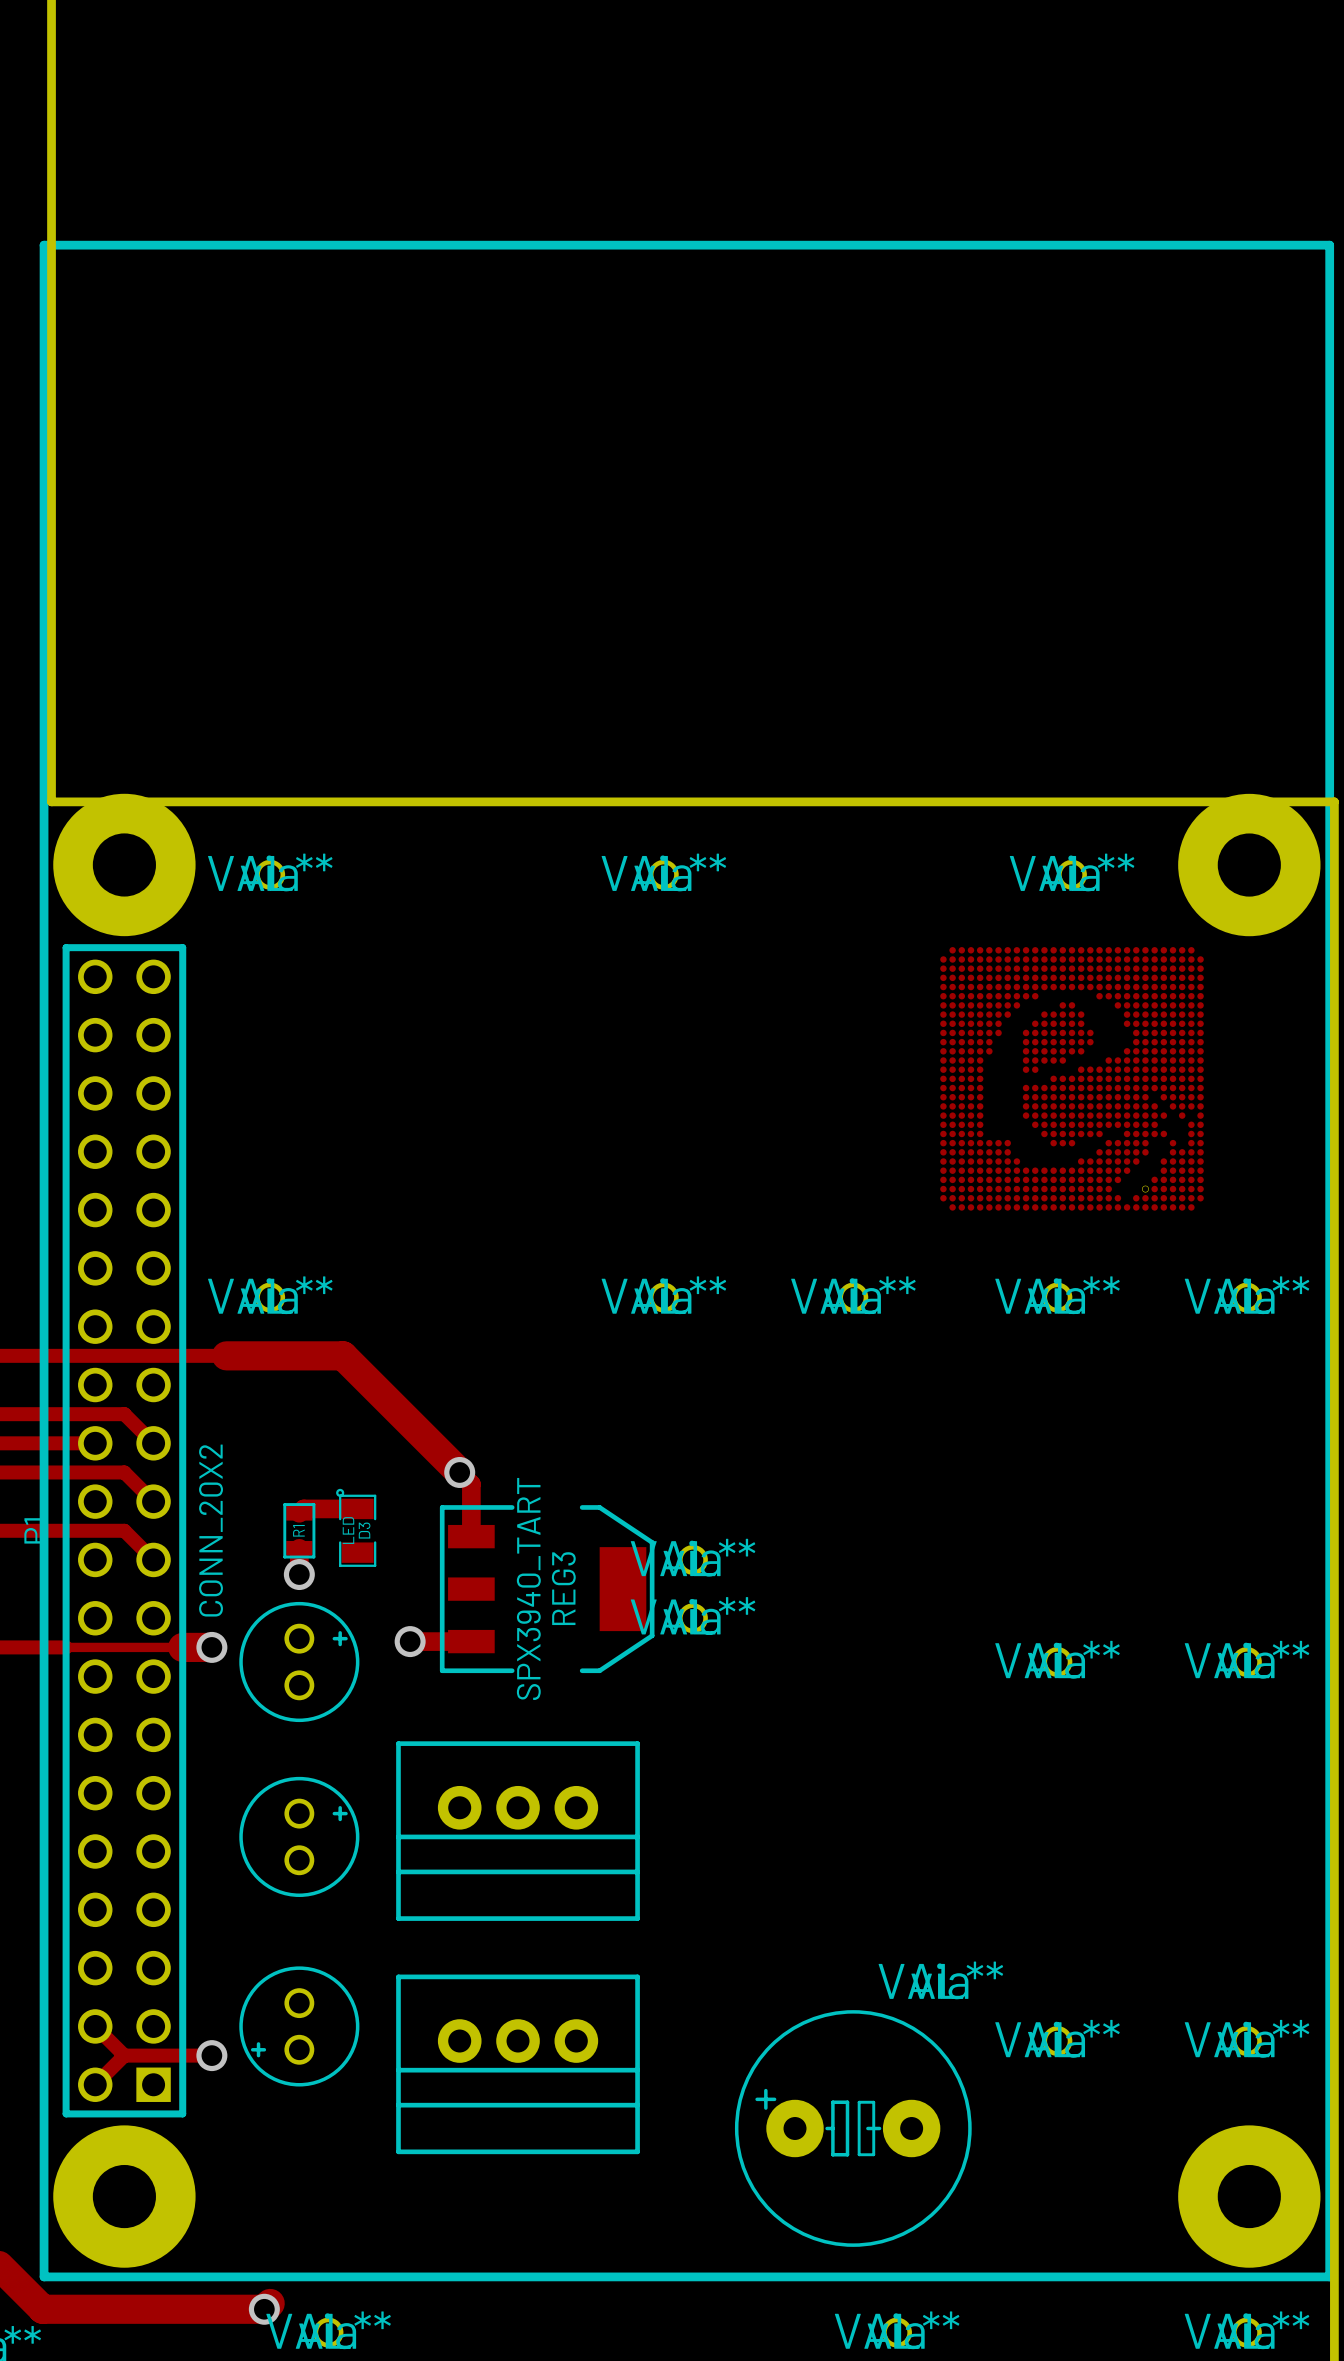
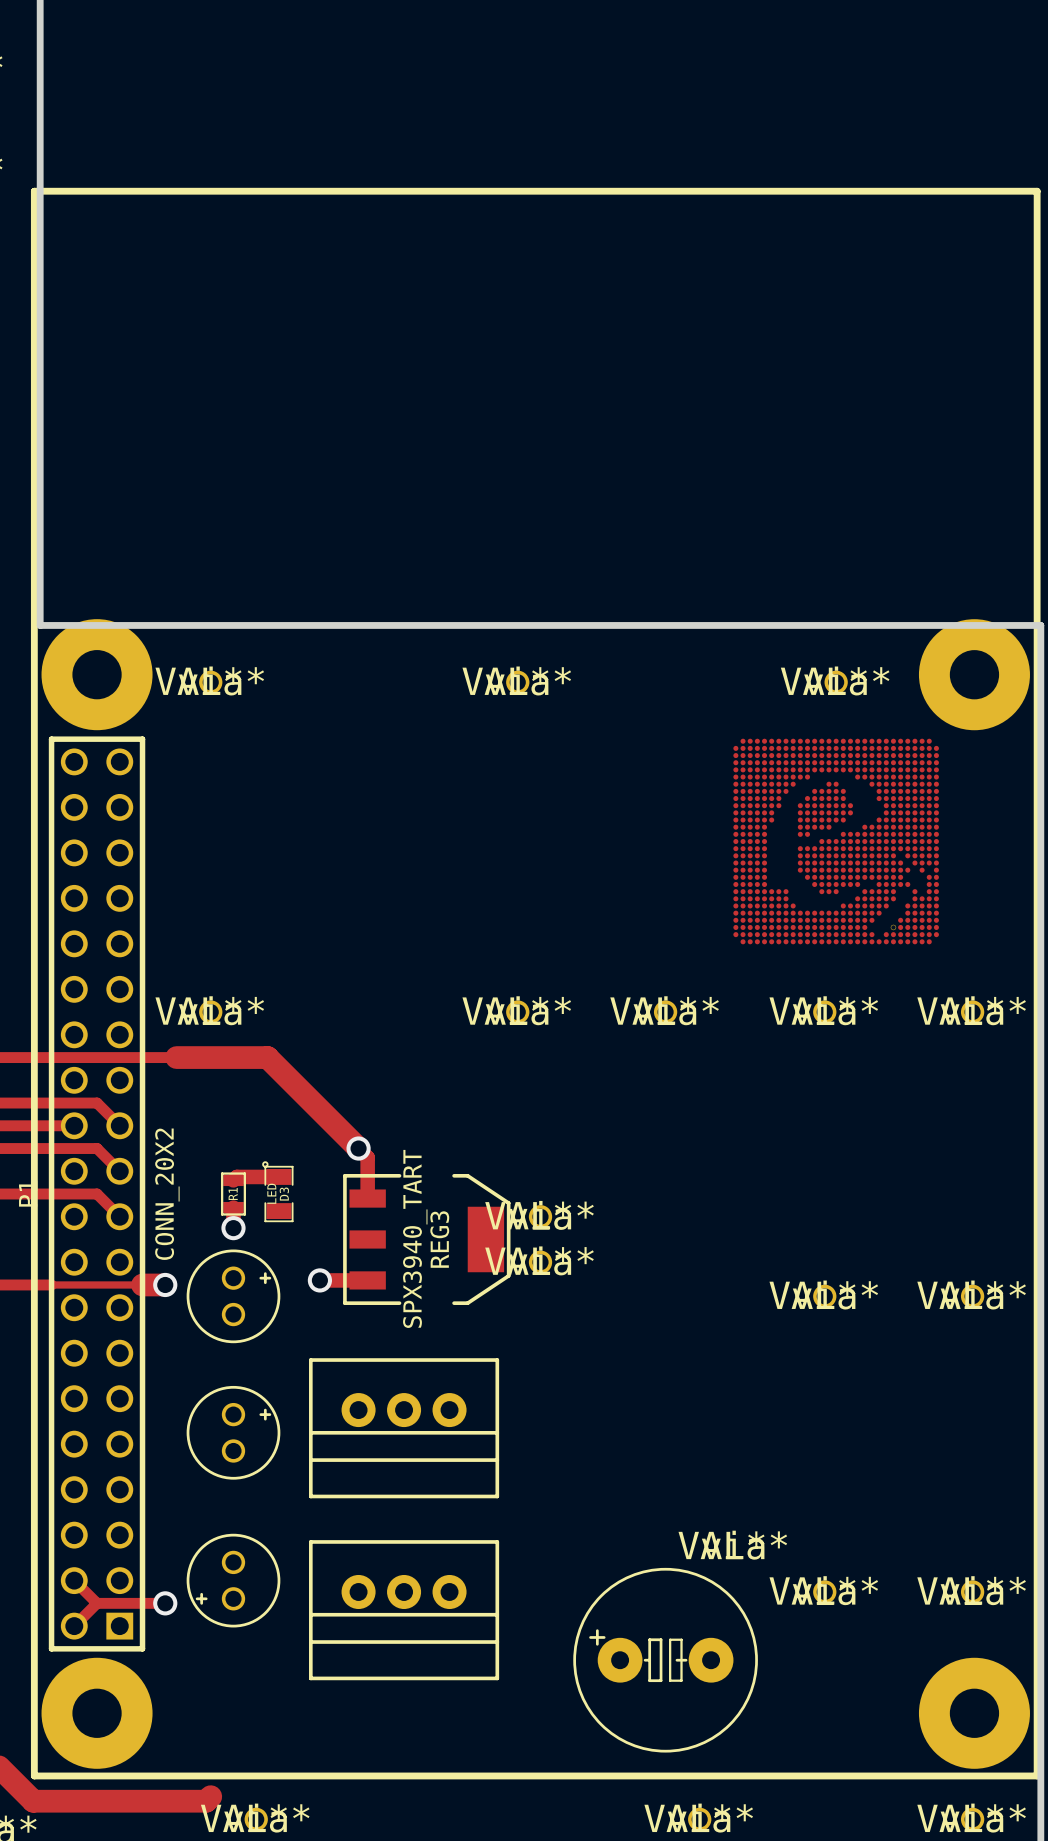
via: (264, 2309) -> none

